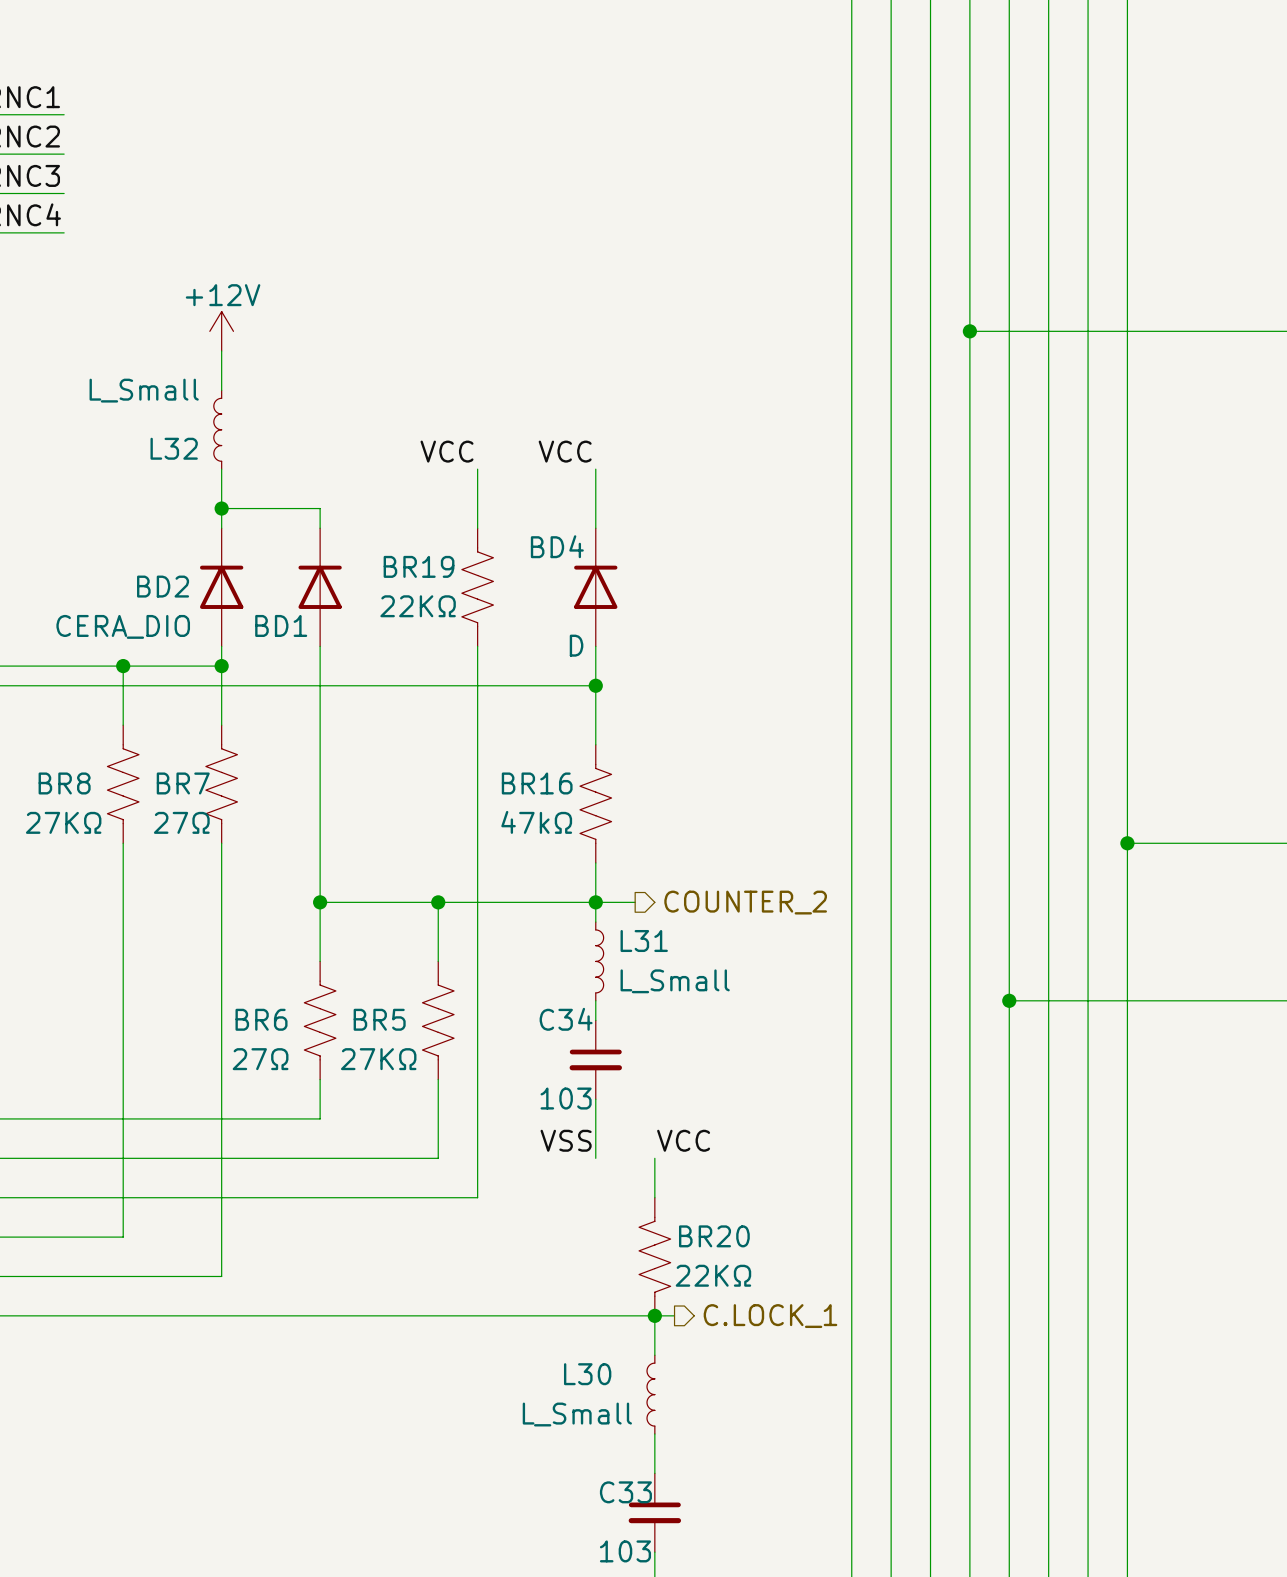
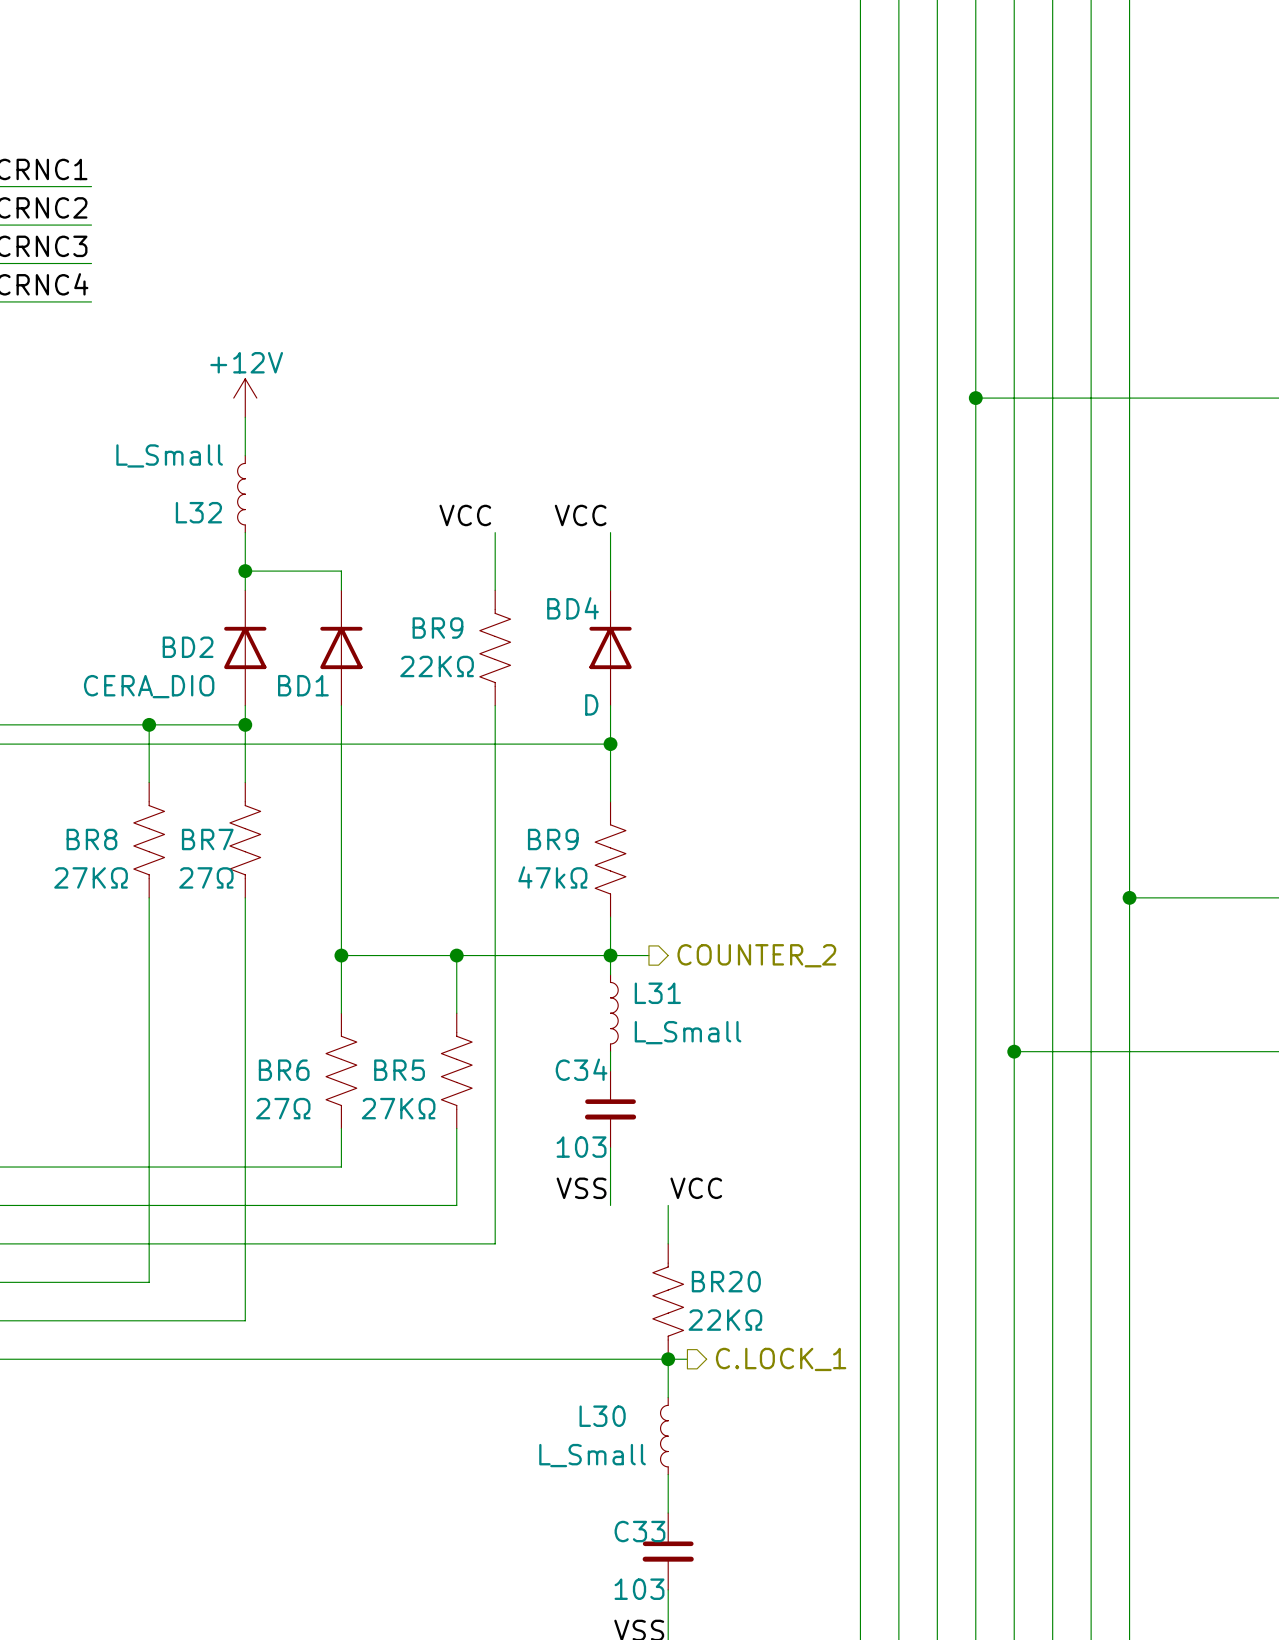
BR19 name: BR19 (419, 566) -> BR9 (437, 628)
BR16 name: BR16 (537, 783) -> BR9 (553, 839)

